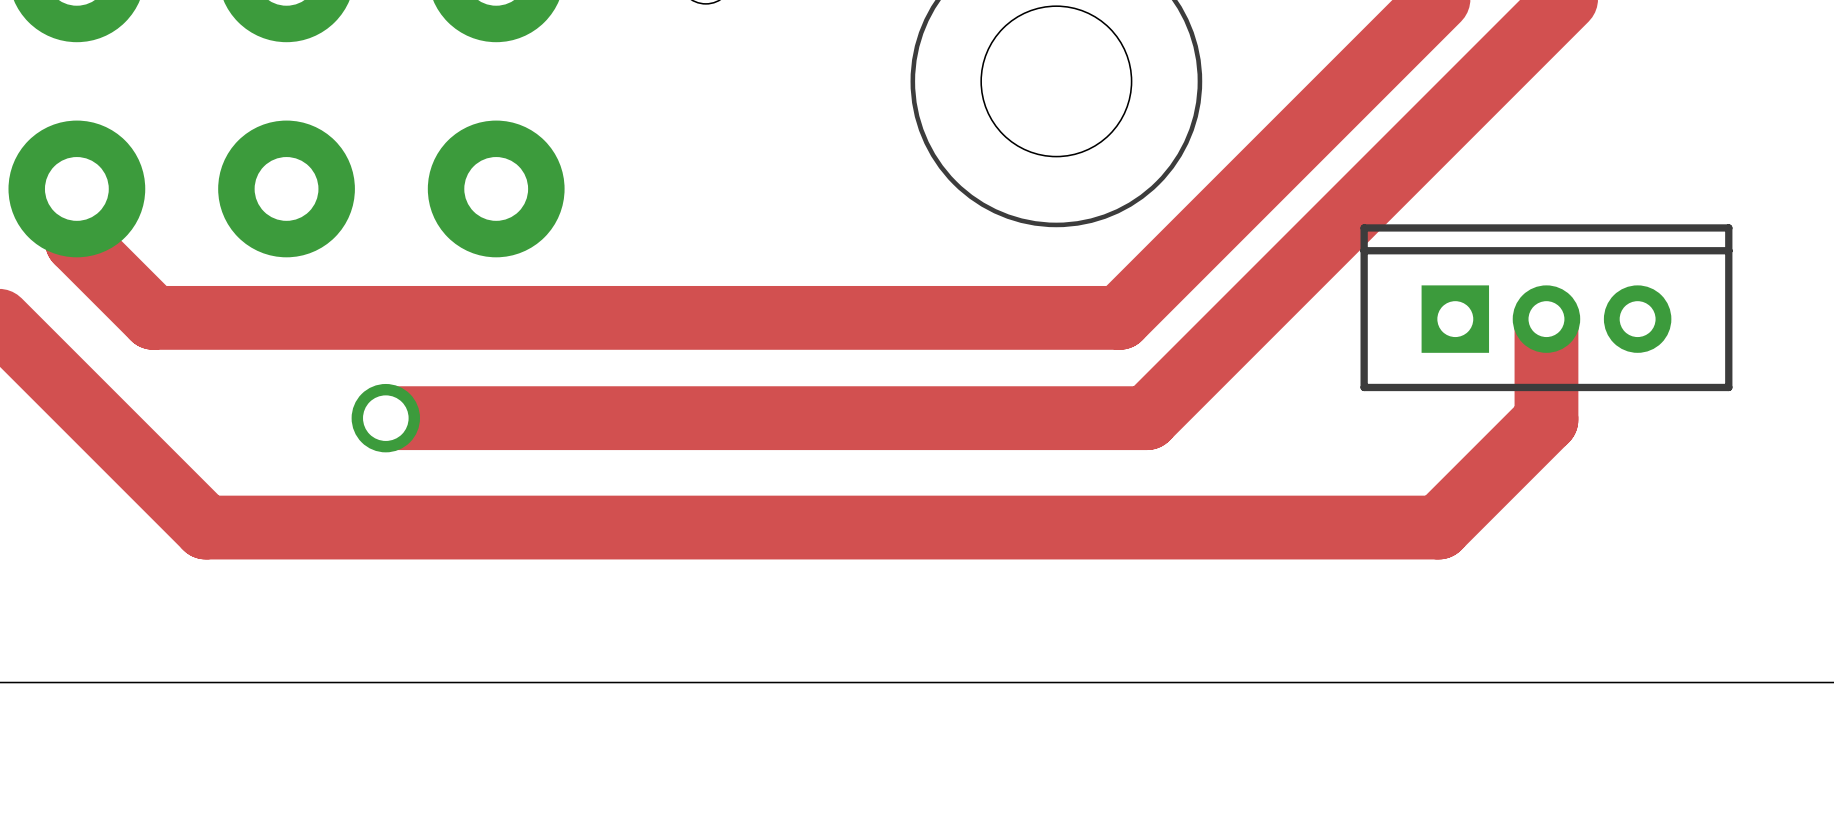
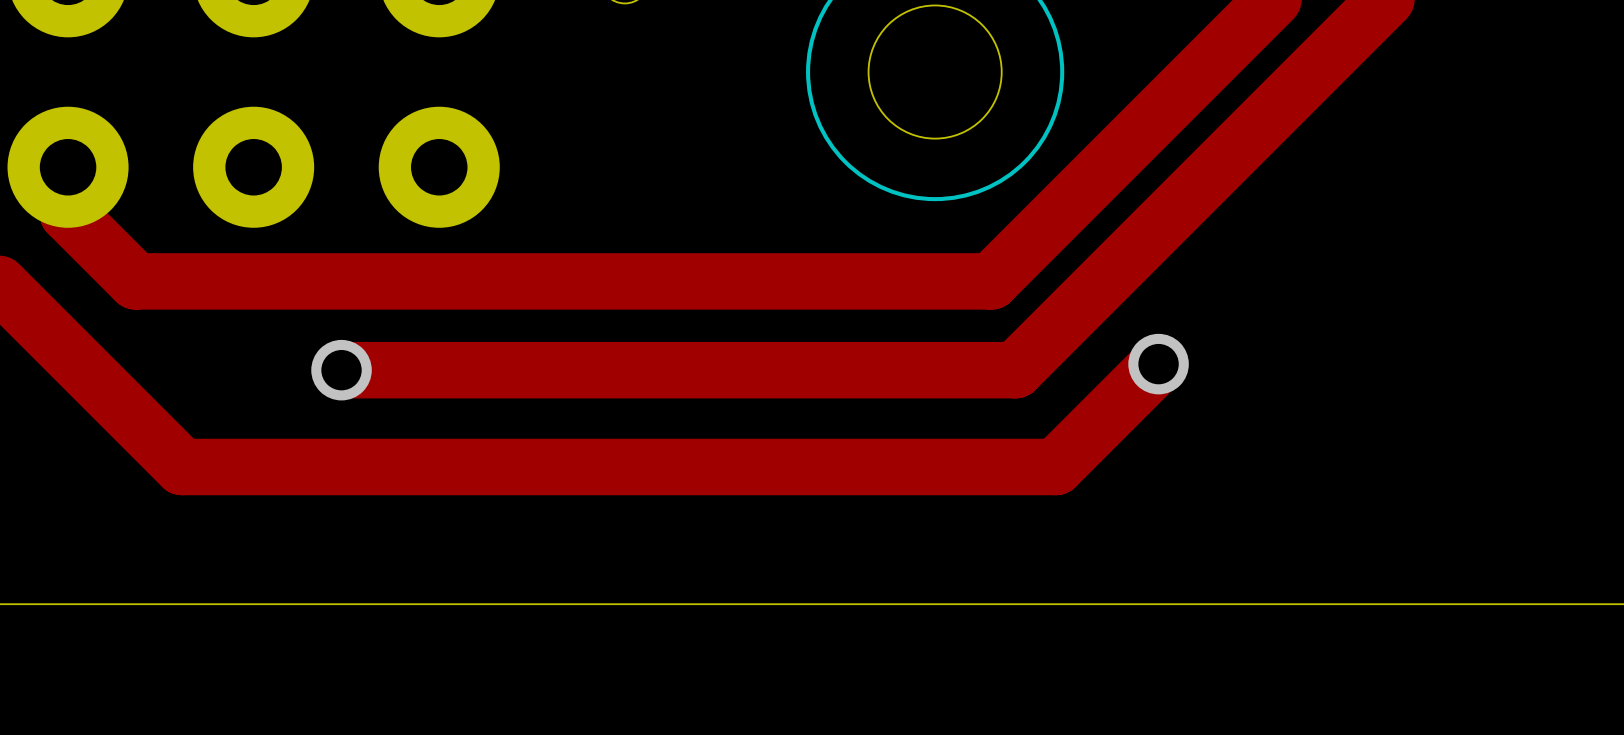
part: (1546, 307) -> none
track: (1546, 319) (1546, 419) (1438, 527) (1192, 527) -> (1158, 364) (1055, 467)
via: none -> (1158, 364)

